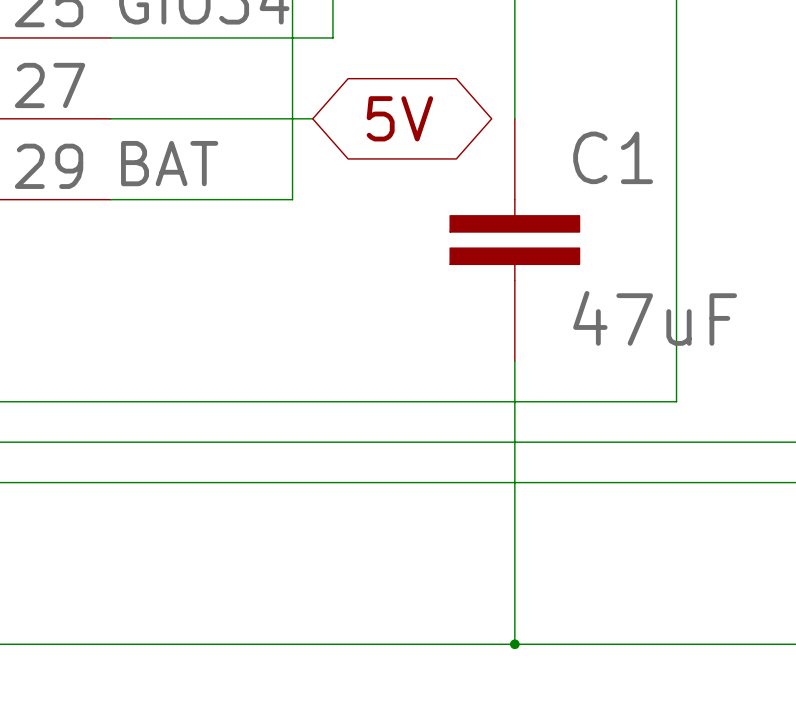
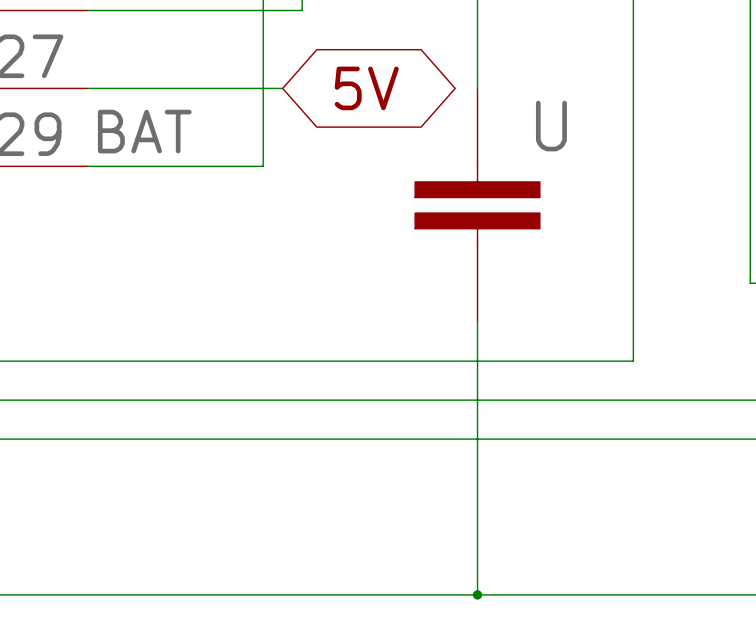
C1 name: C1 (613, 157) -> U (551, 126)
C1 value: 47uF (655, 318) -> none

